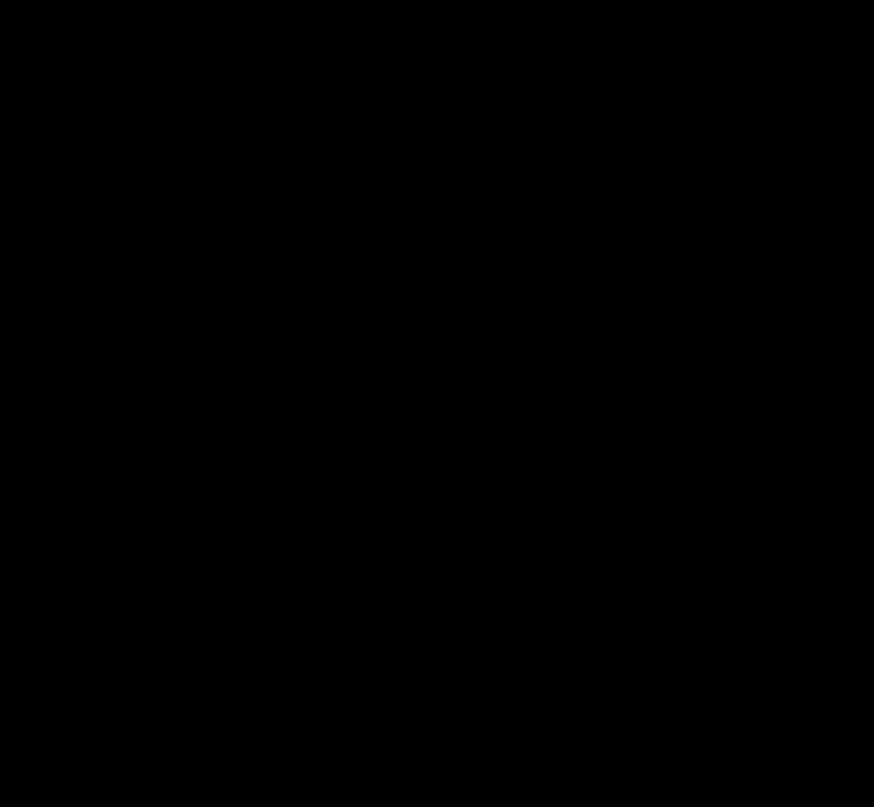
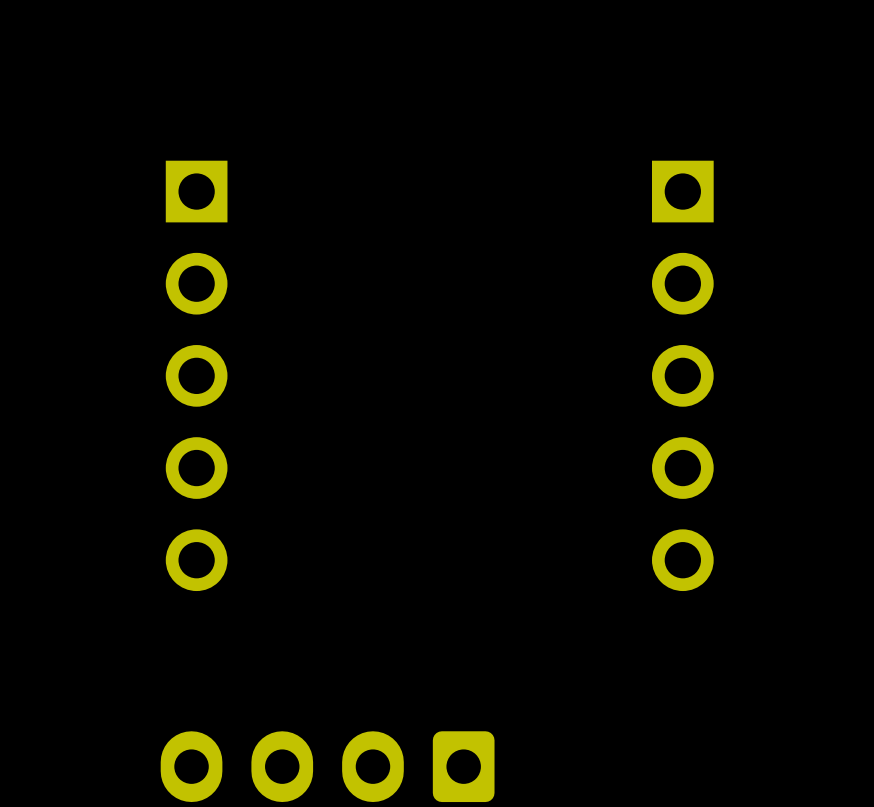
part: none -> (196, 375)
part: none -> (682, 375)
part: none -> (327, 766)

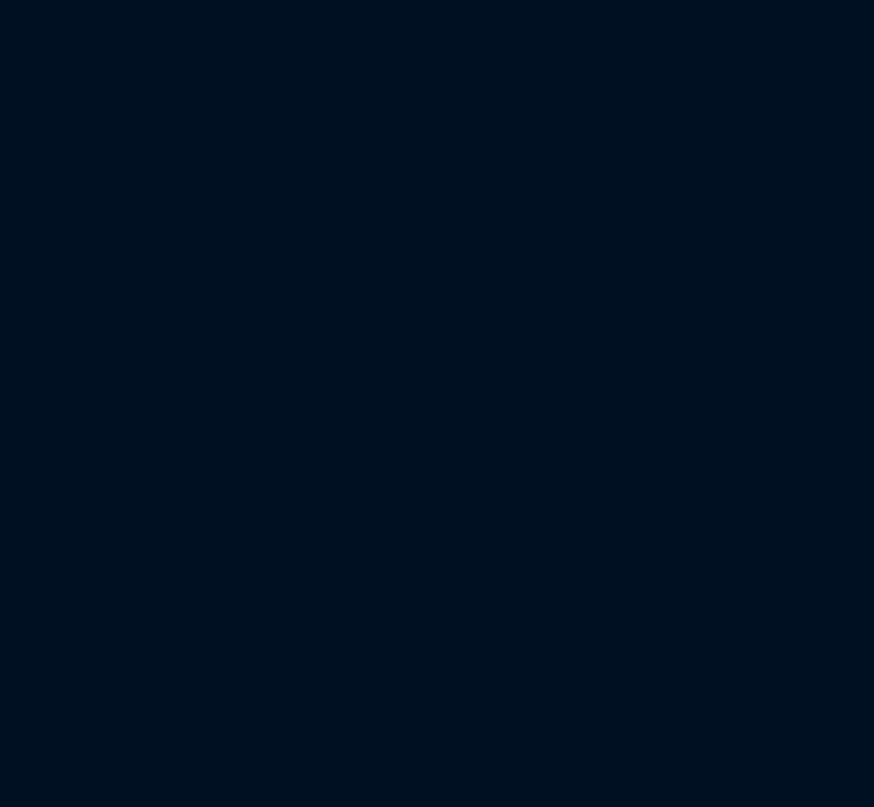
part: (196, 375) -> none
part: (682, 375) -> none
part: (327, 766) -> none

